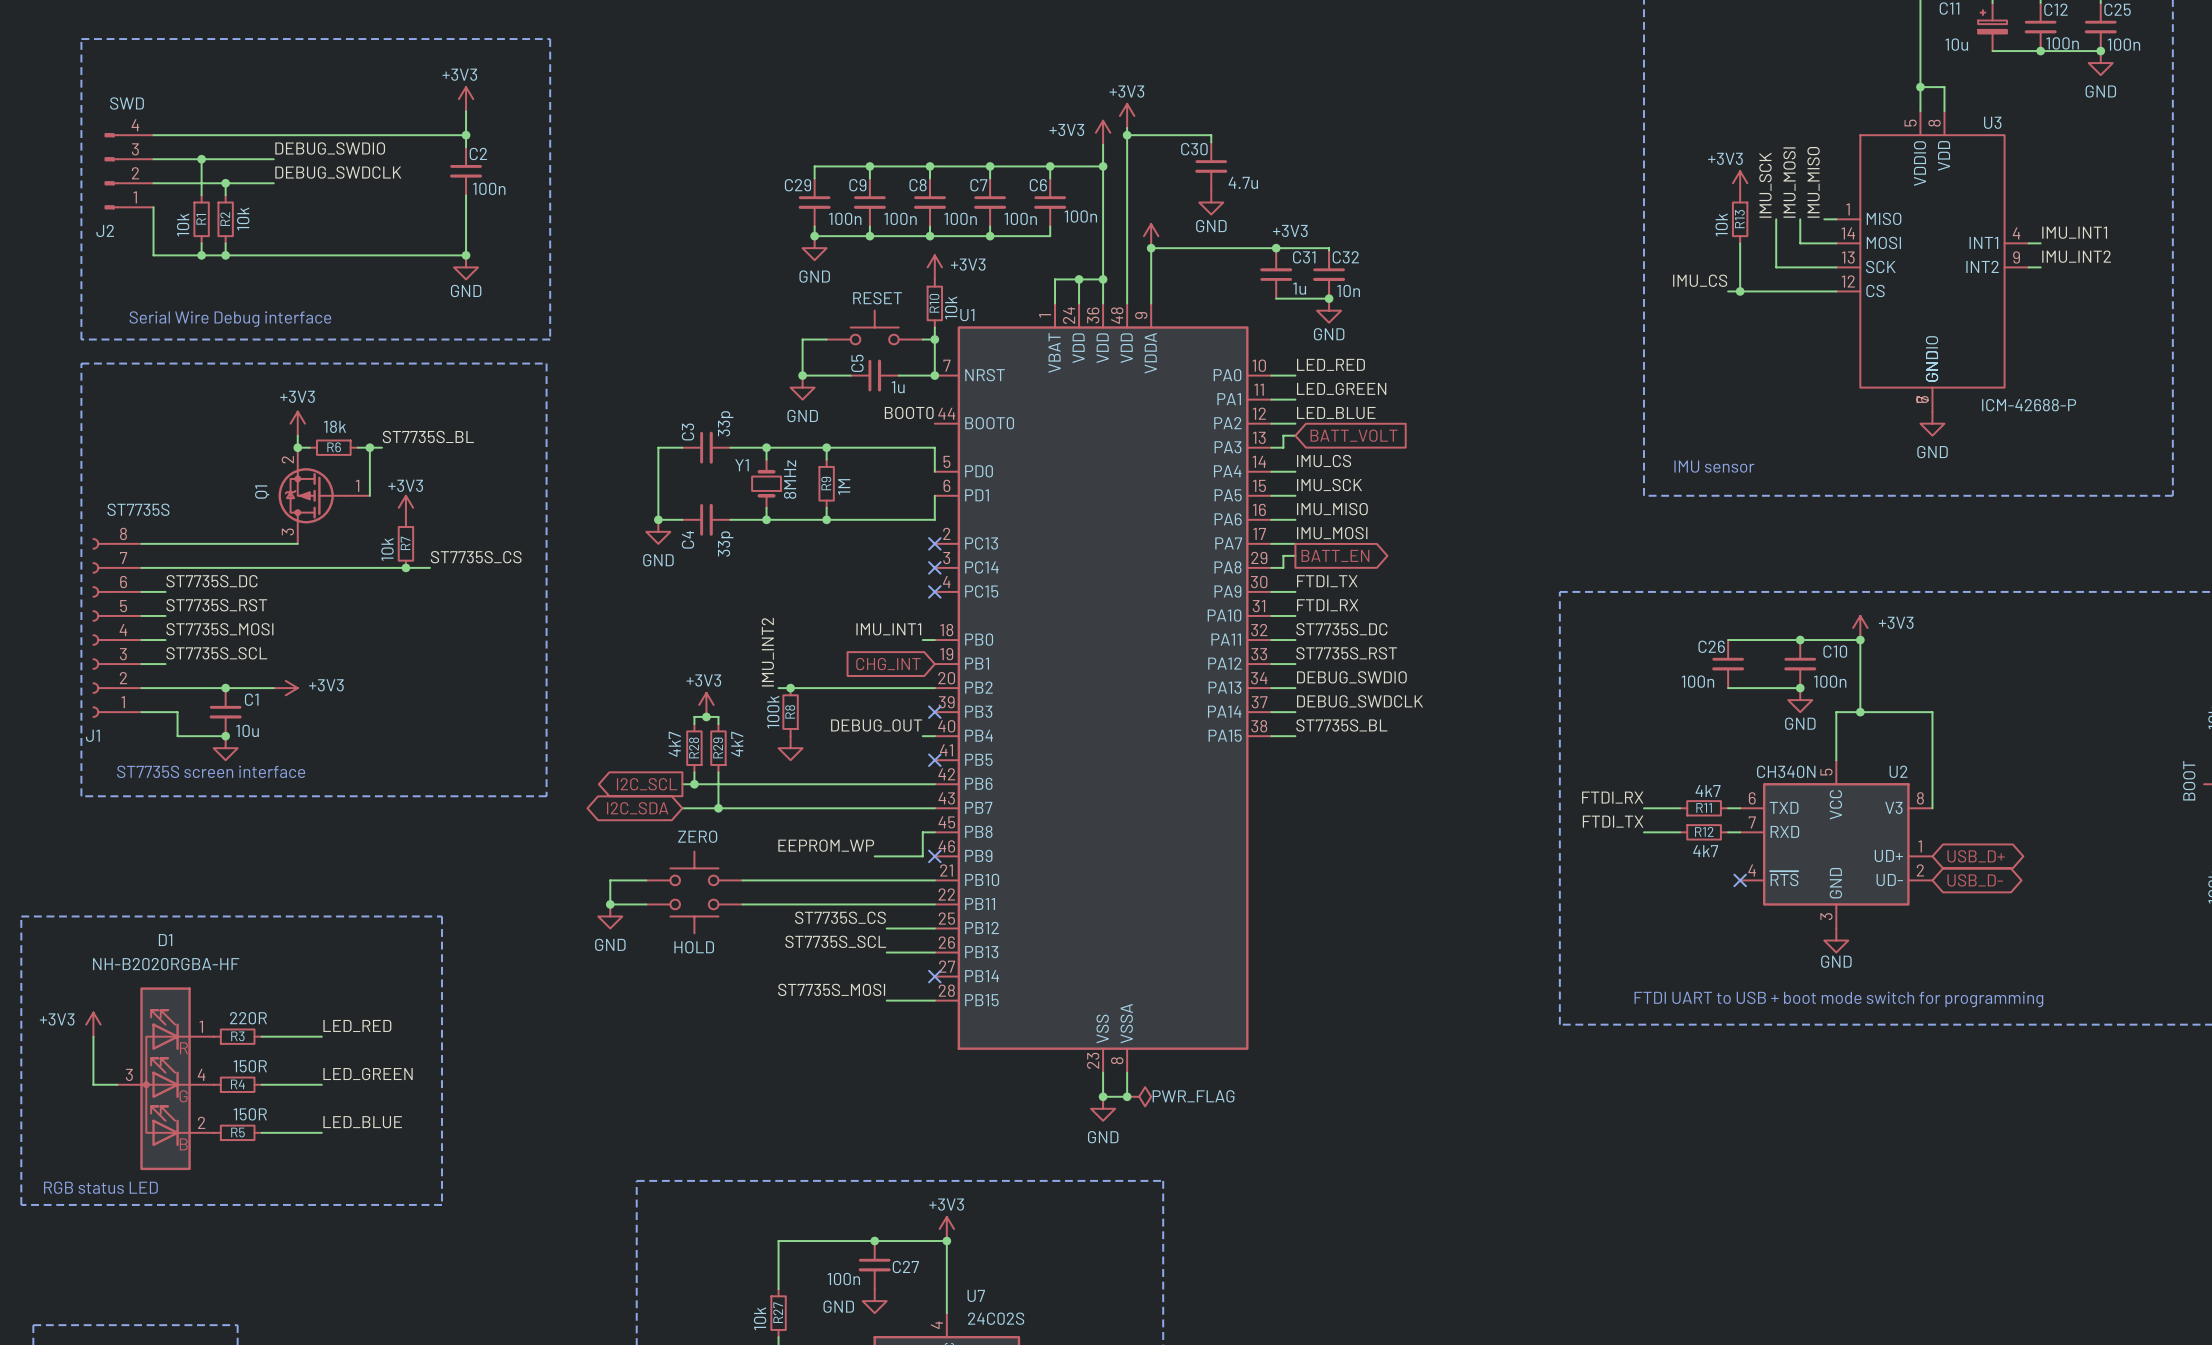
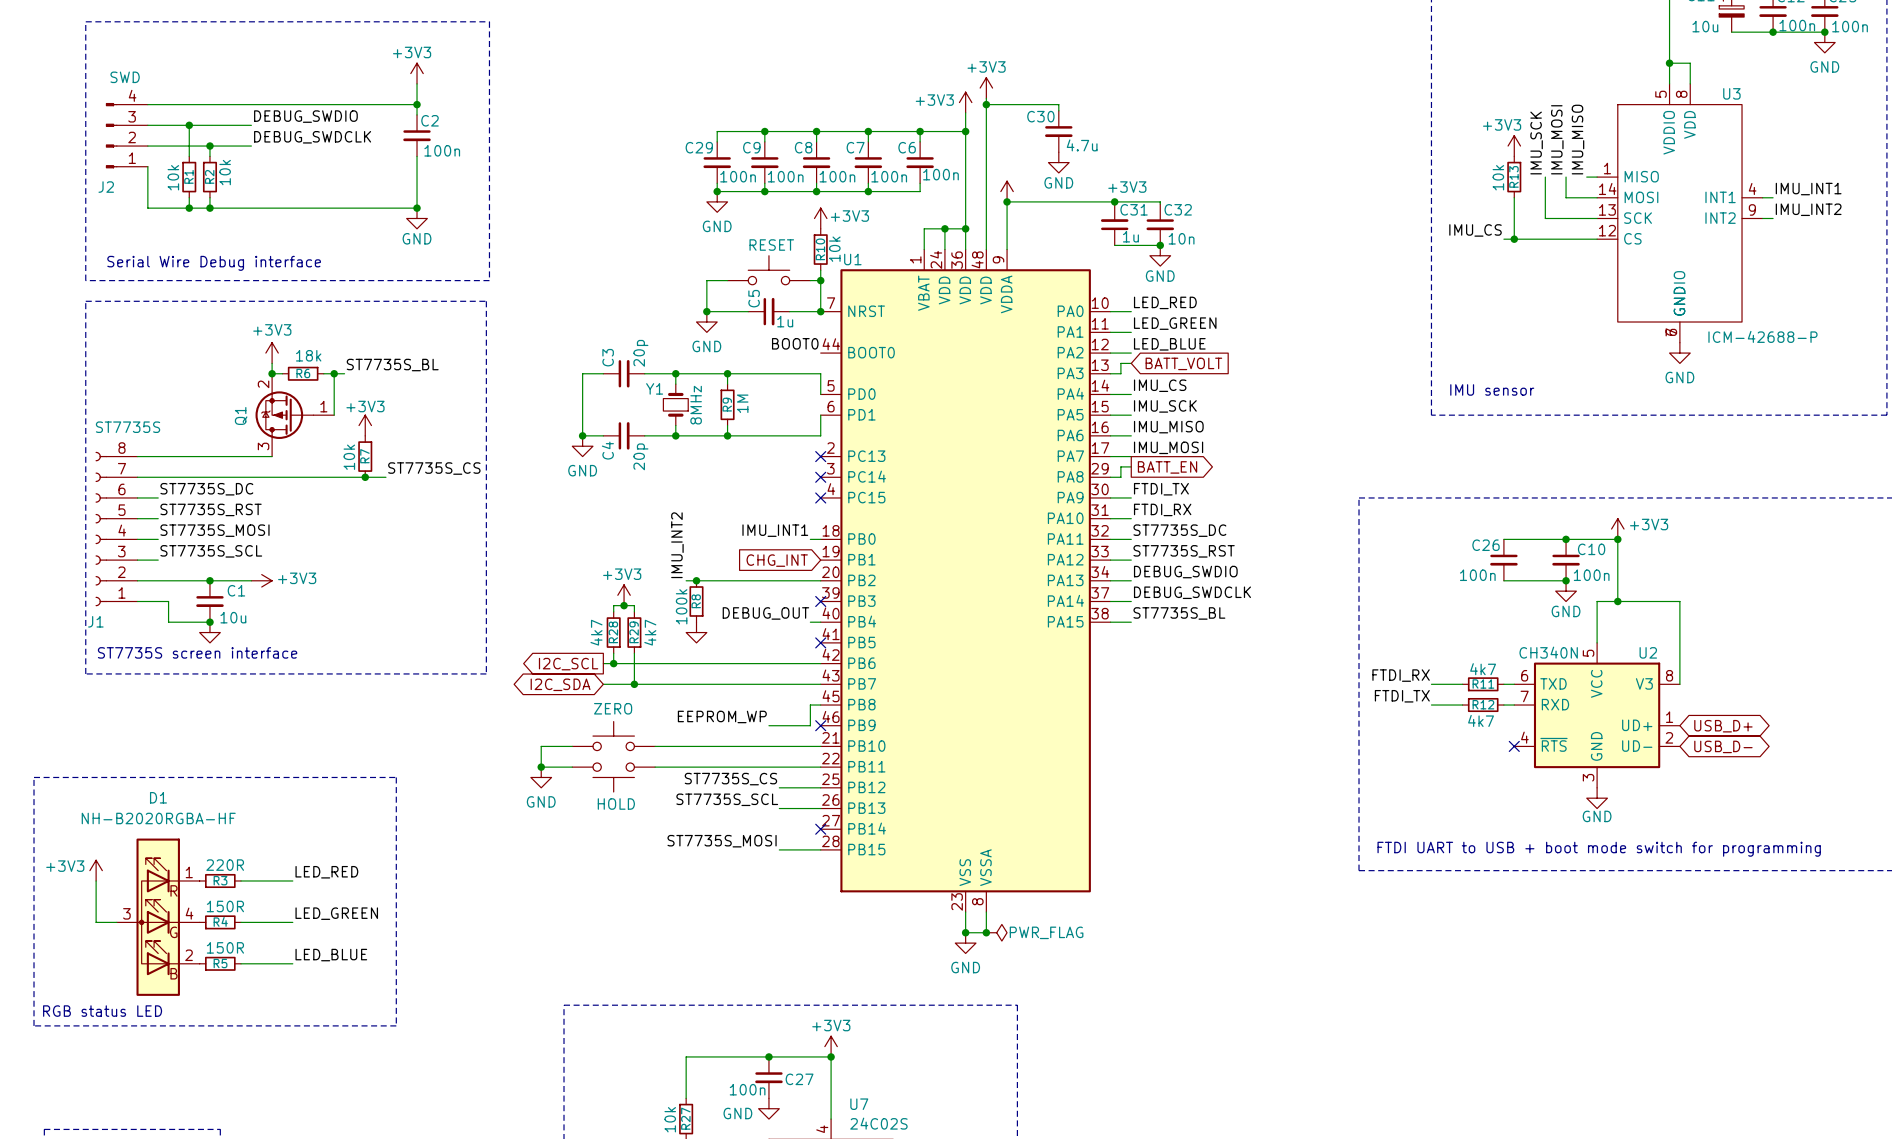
C3 value: 33p (725, 423) -> 20p (640, 353)
C4 value: 33p (725, 543) -> 20p (640, 456)

